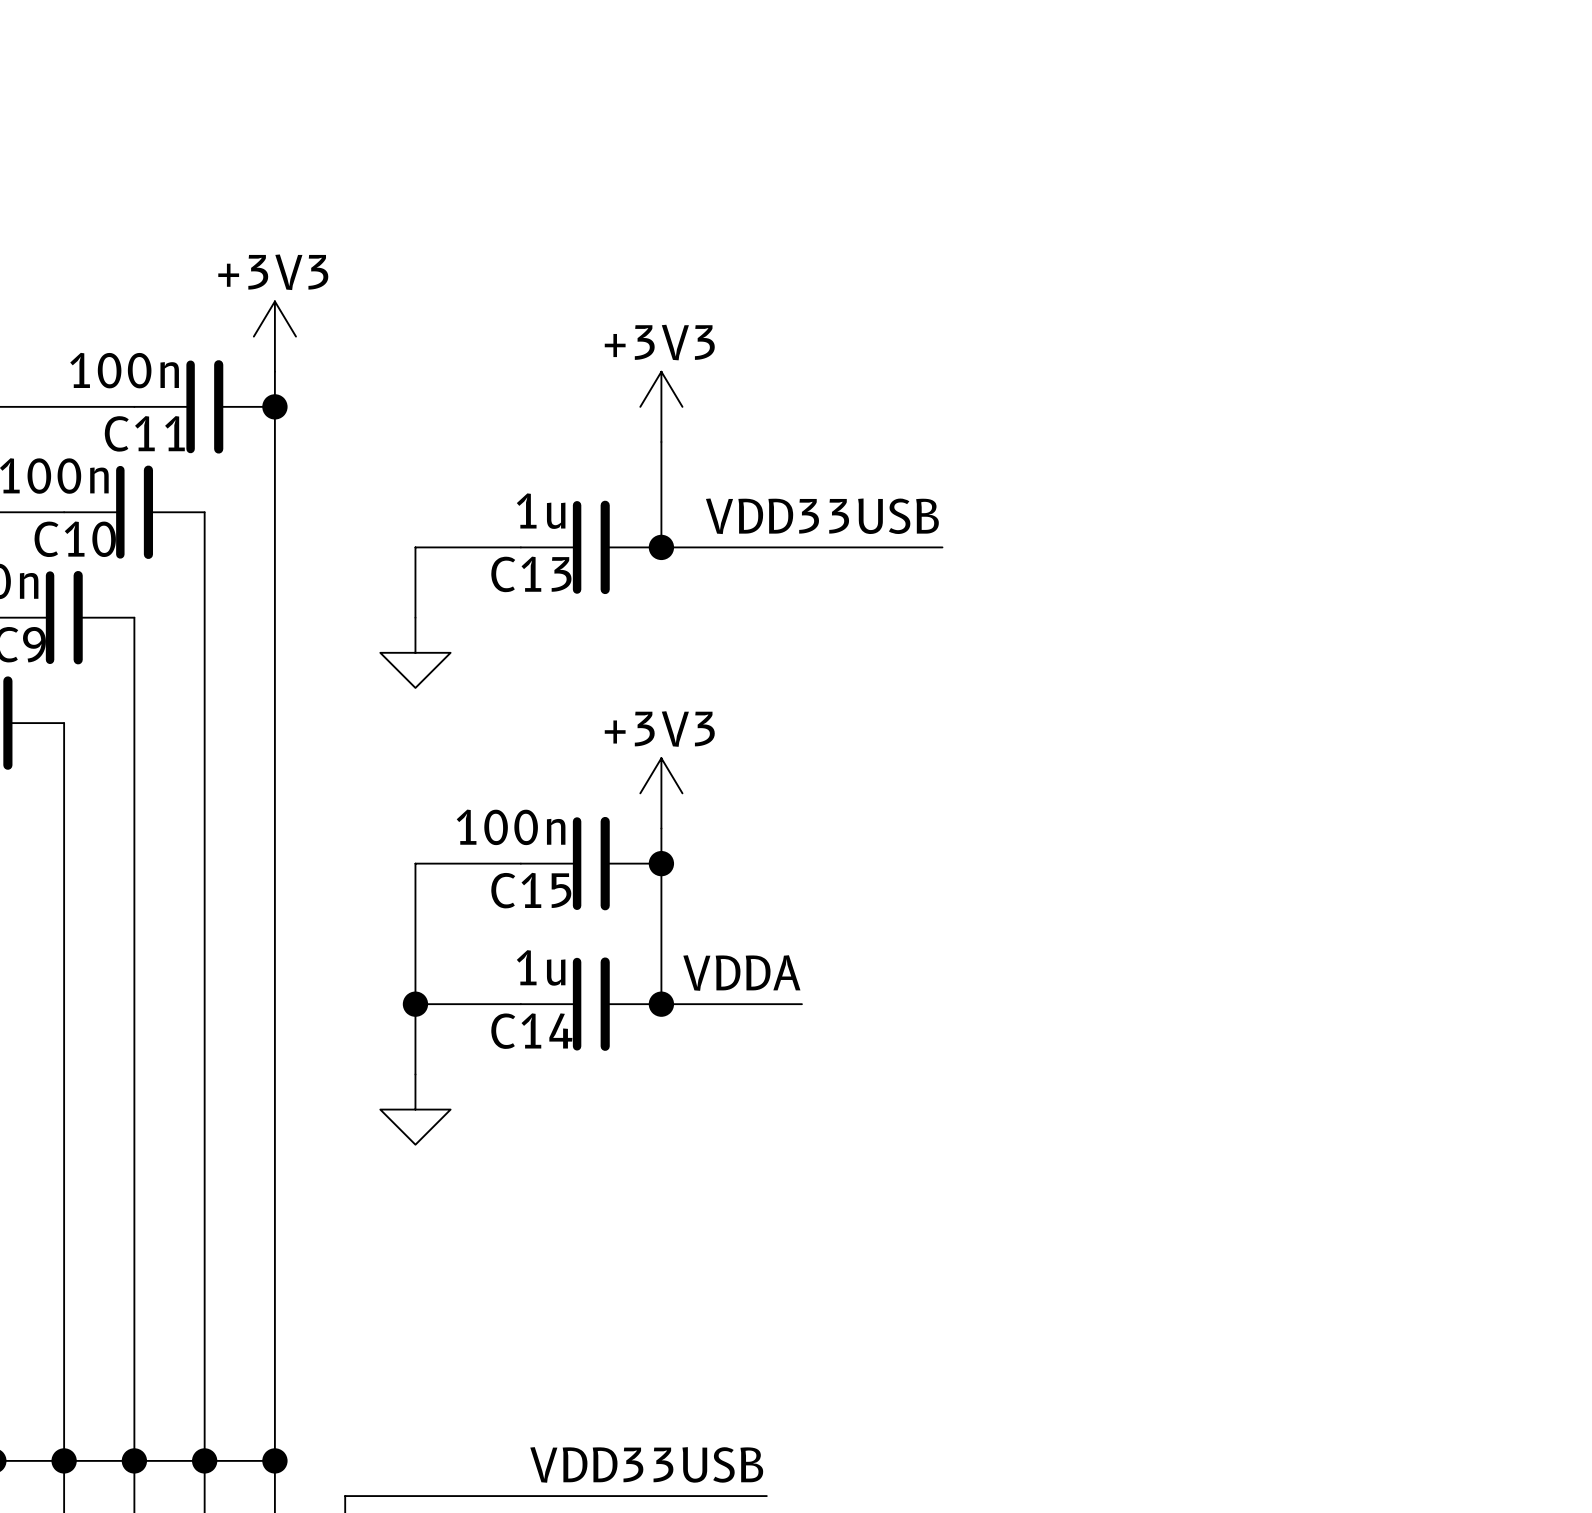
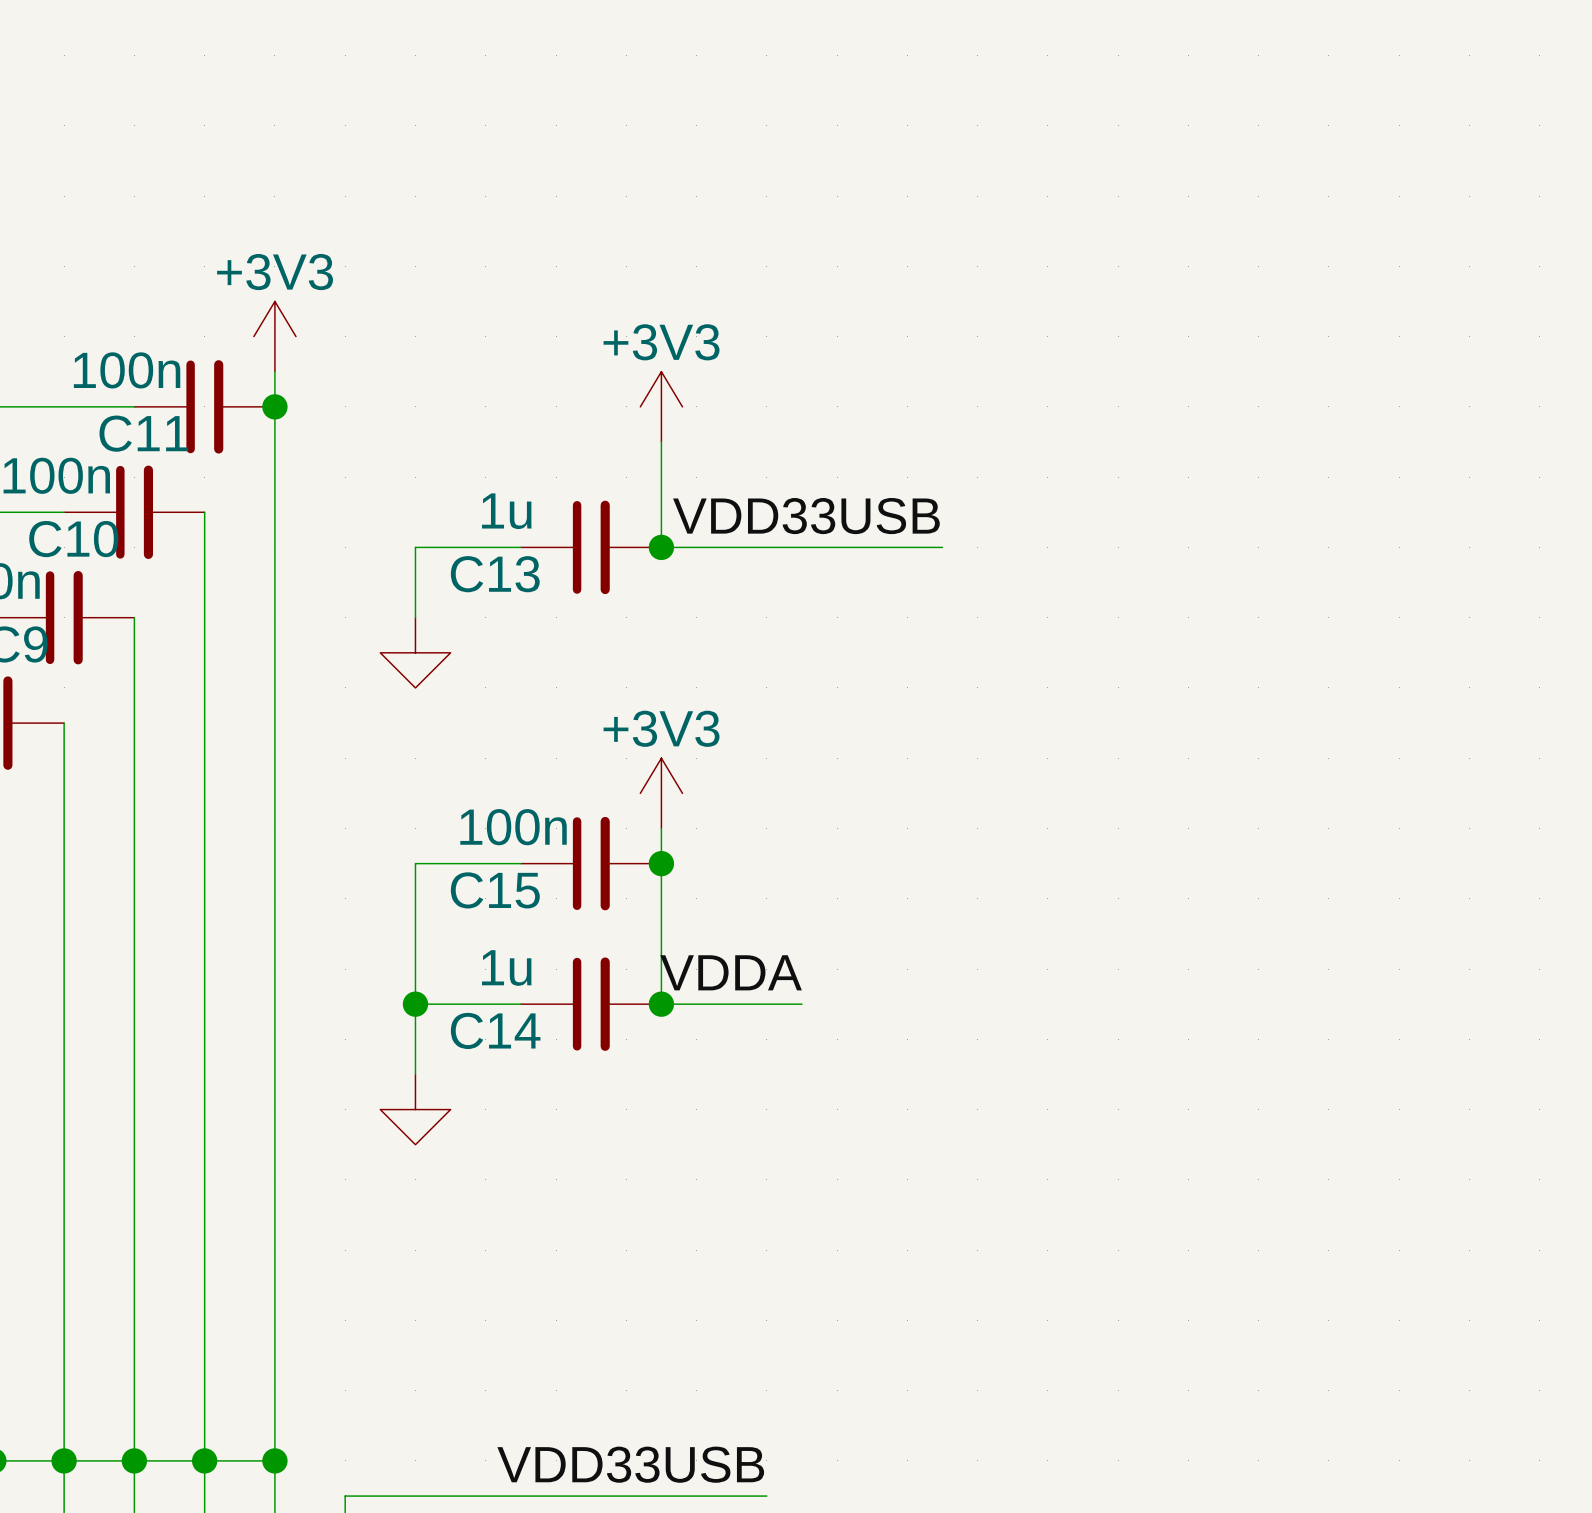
C13 value position: 1u (541, 511) -> 1u (506, 511)
C13 name position: C13 (531, 574) -> C13 (495, 574)
C15 name position: C15 (531, 890) -> C15 (495, 890)
C14 value position: 1u (541, 967) -> 1u (506, 967)
C14 name position: C14 (531, 1031) -> C14 (495, 1030)

